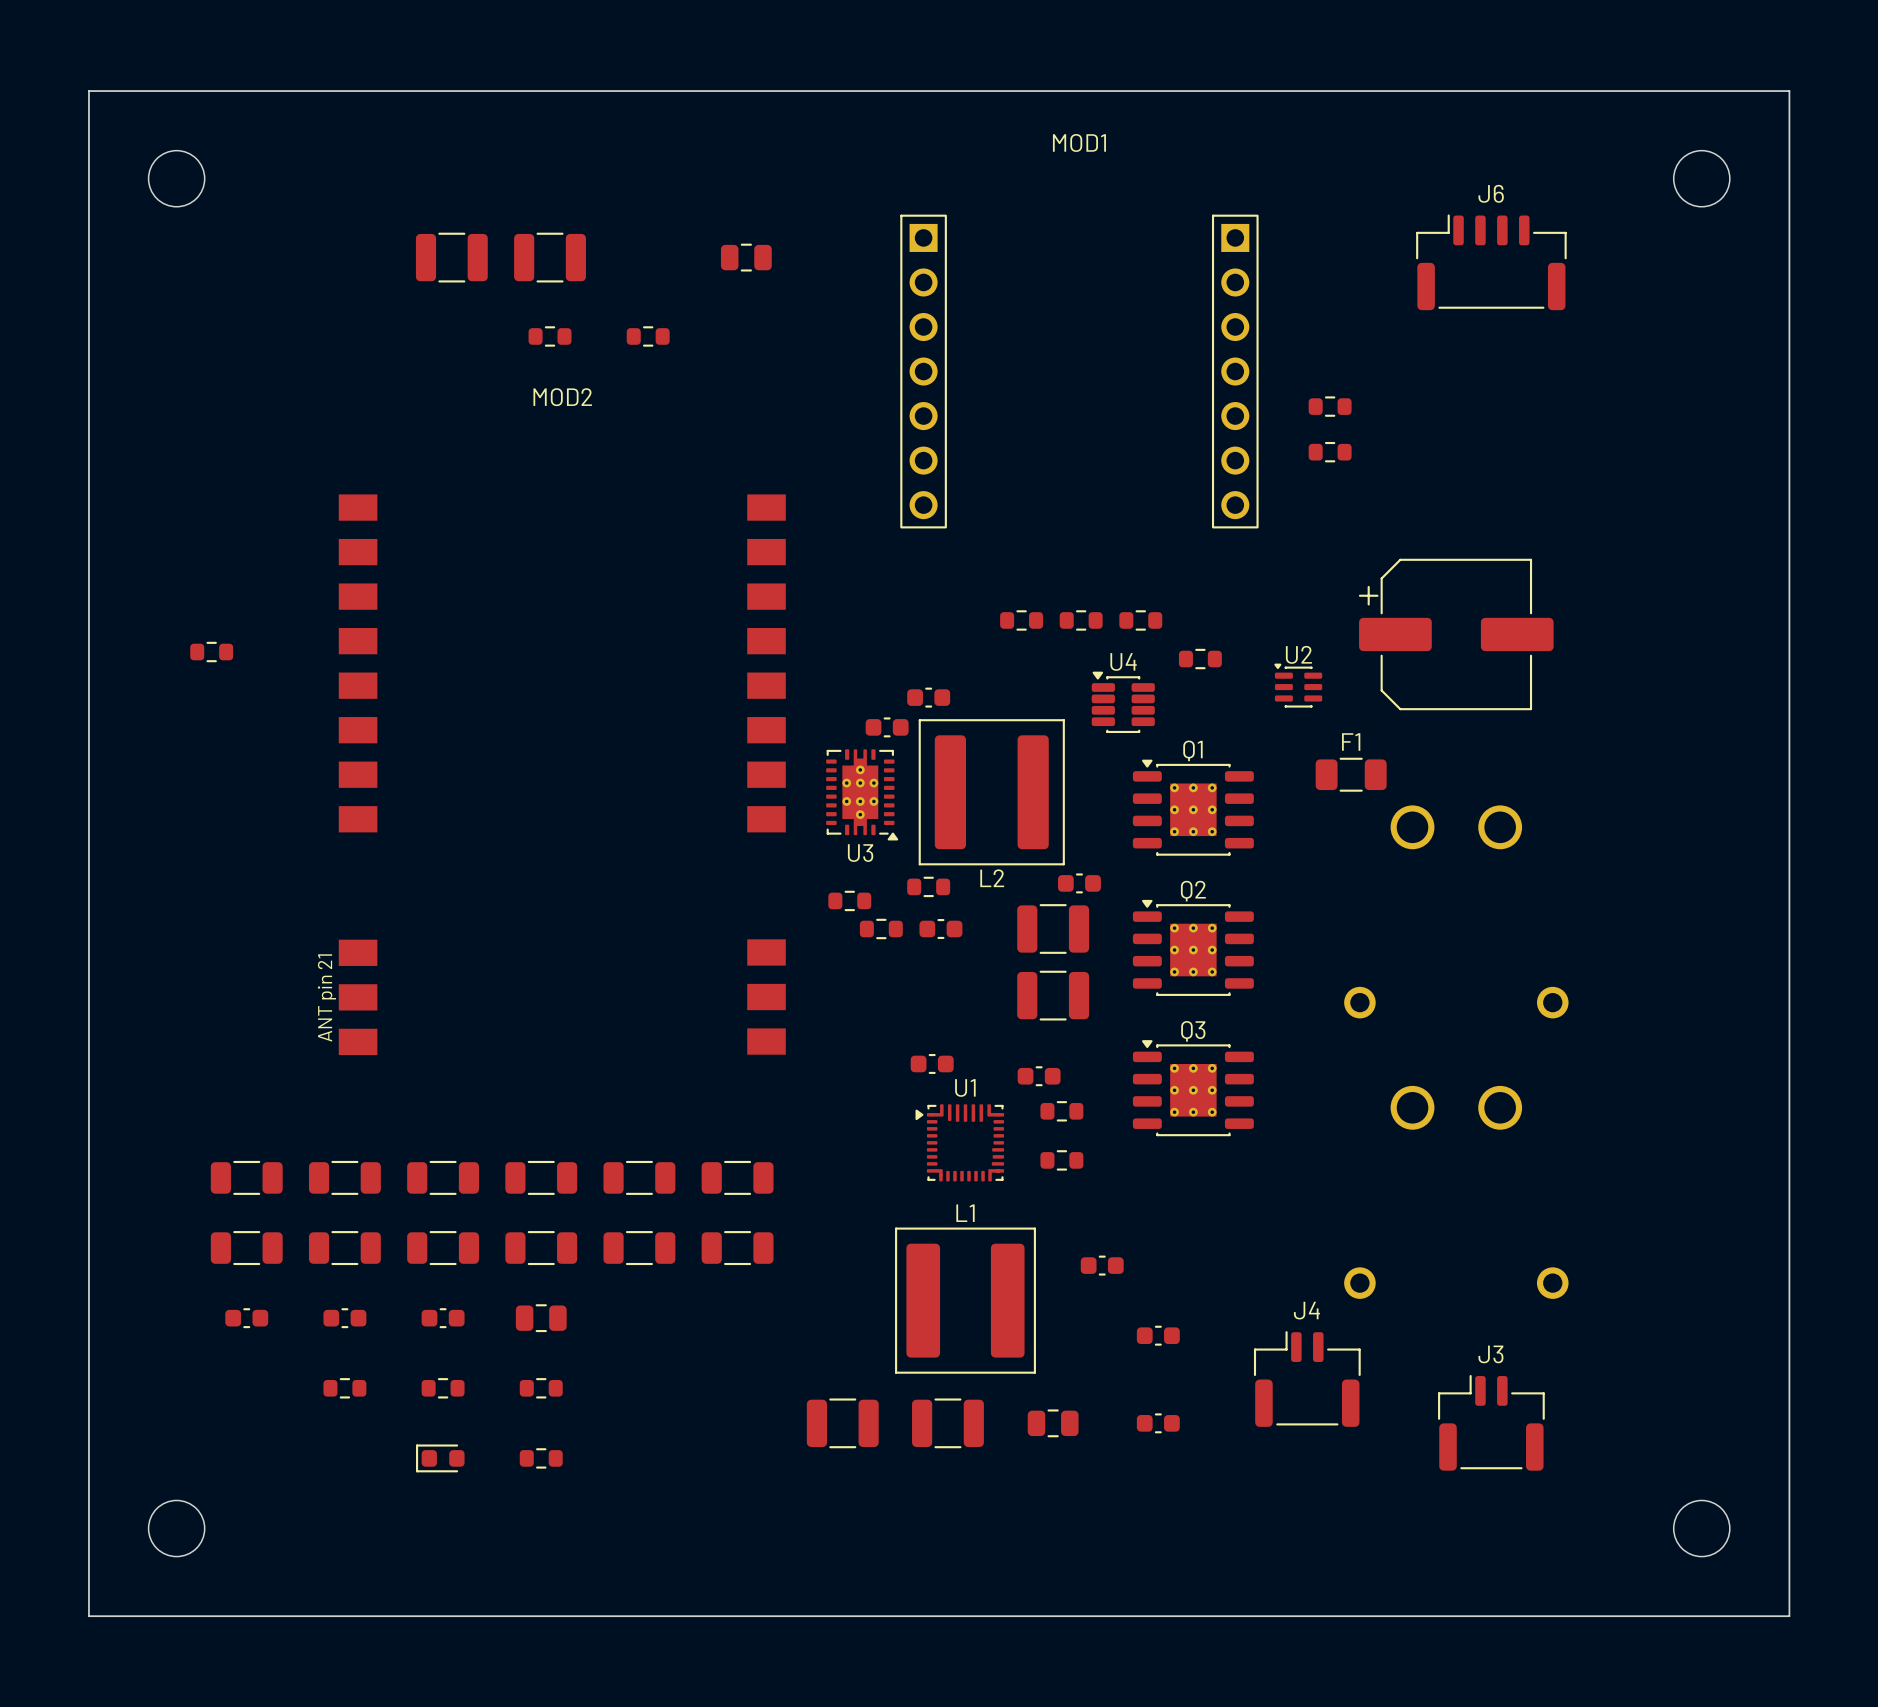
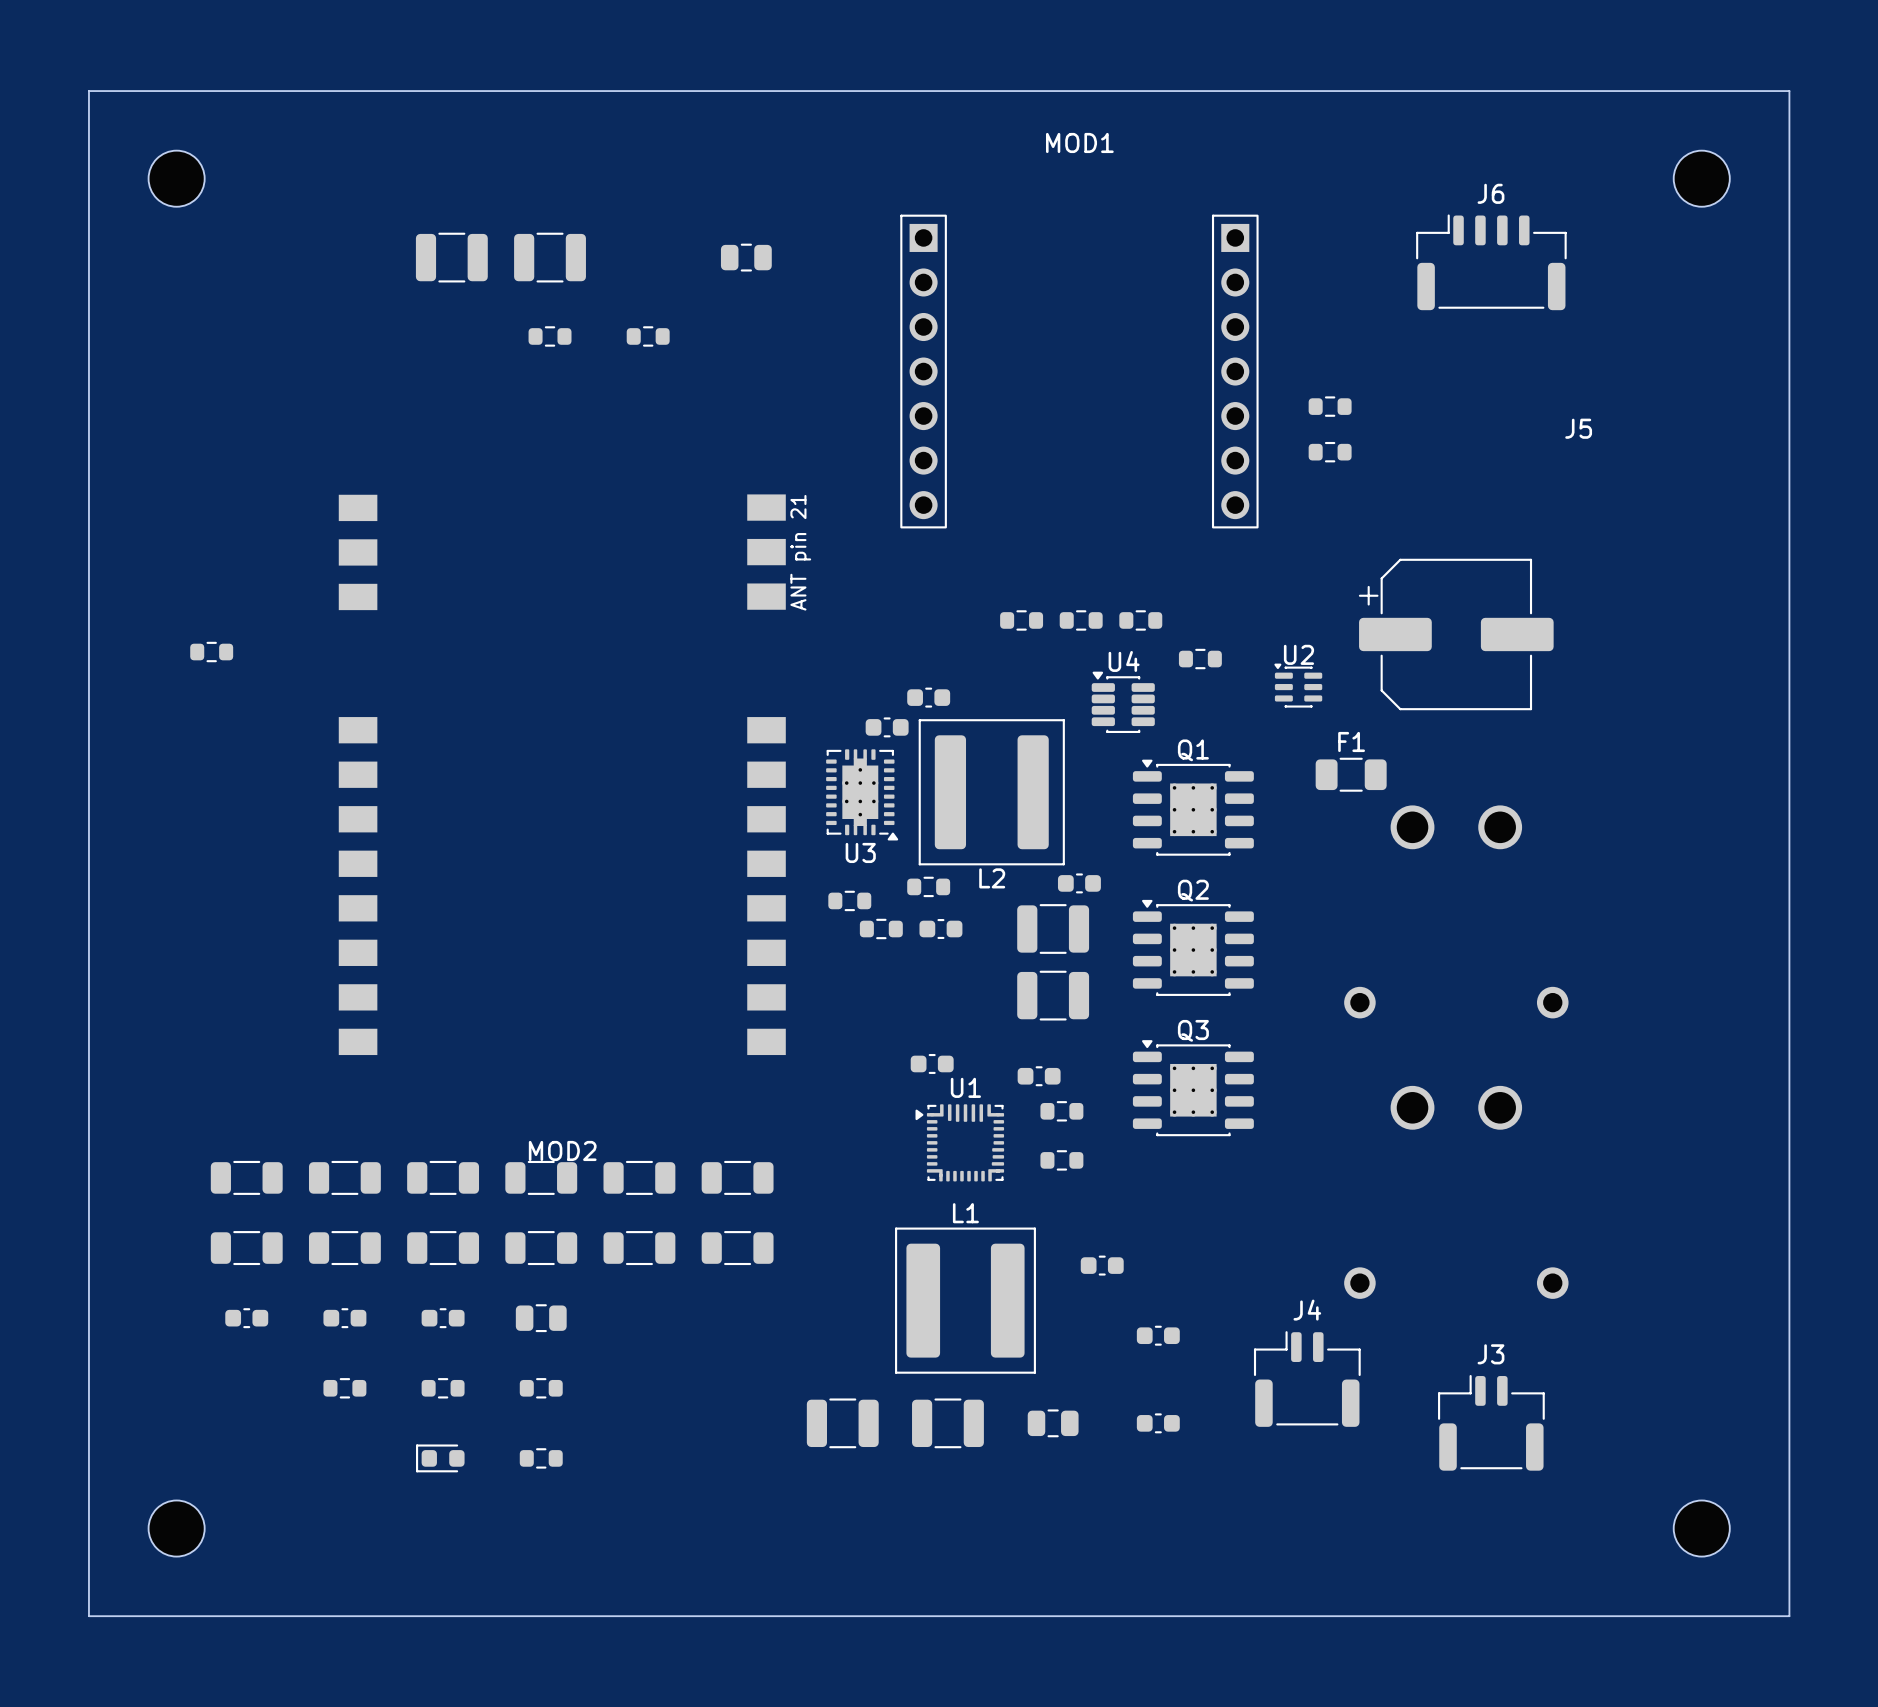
J5: none -> (1578, 428)
MOD2 rotation: 0° (562, 774) -> 180° (562, 774)

